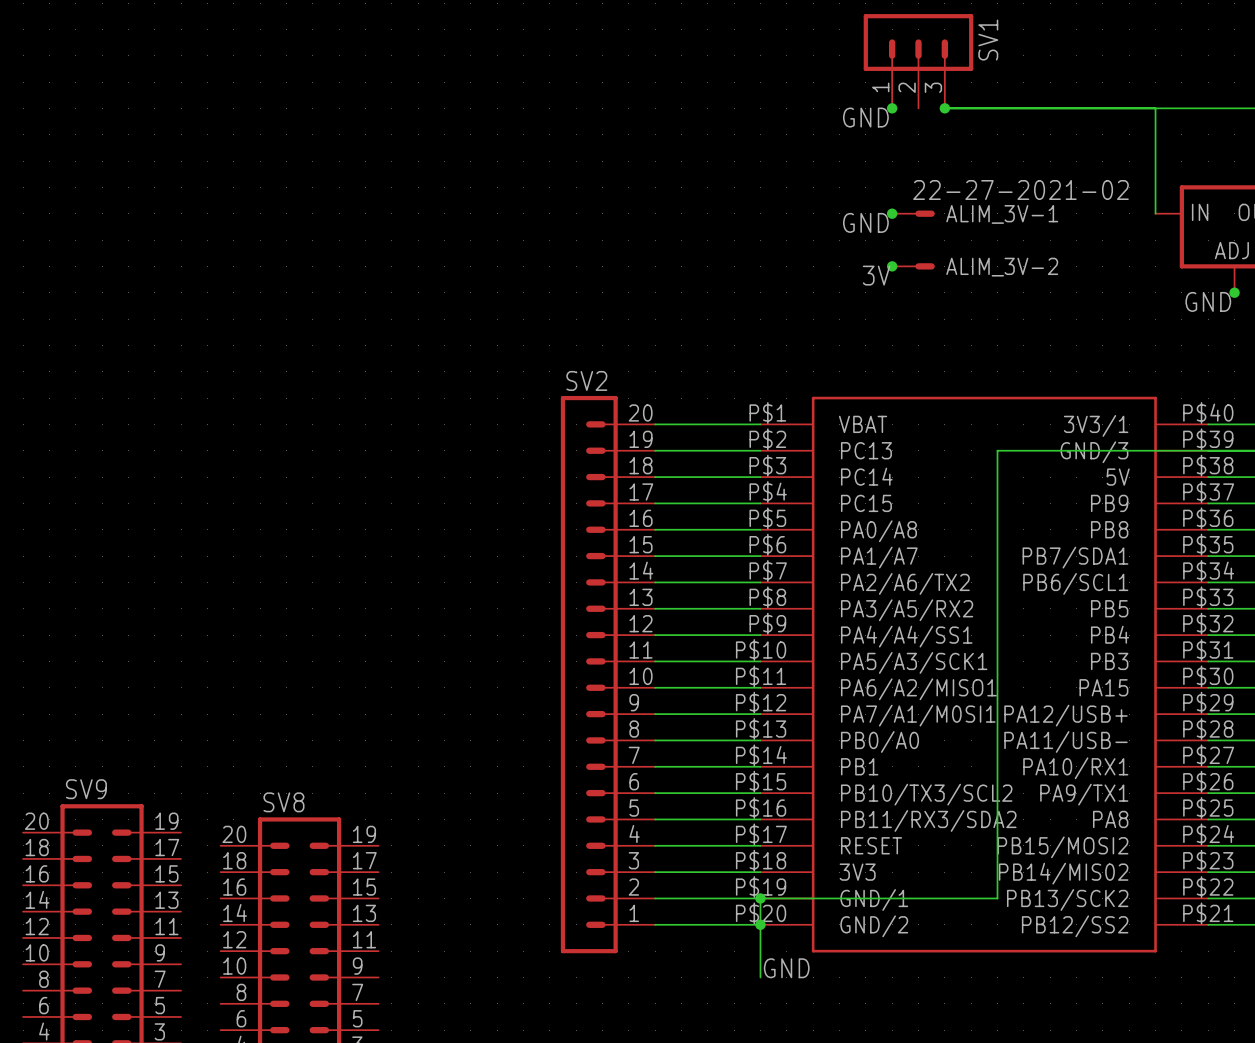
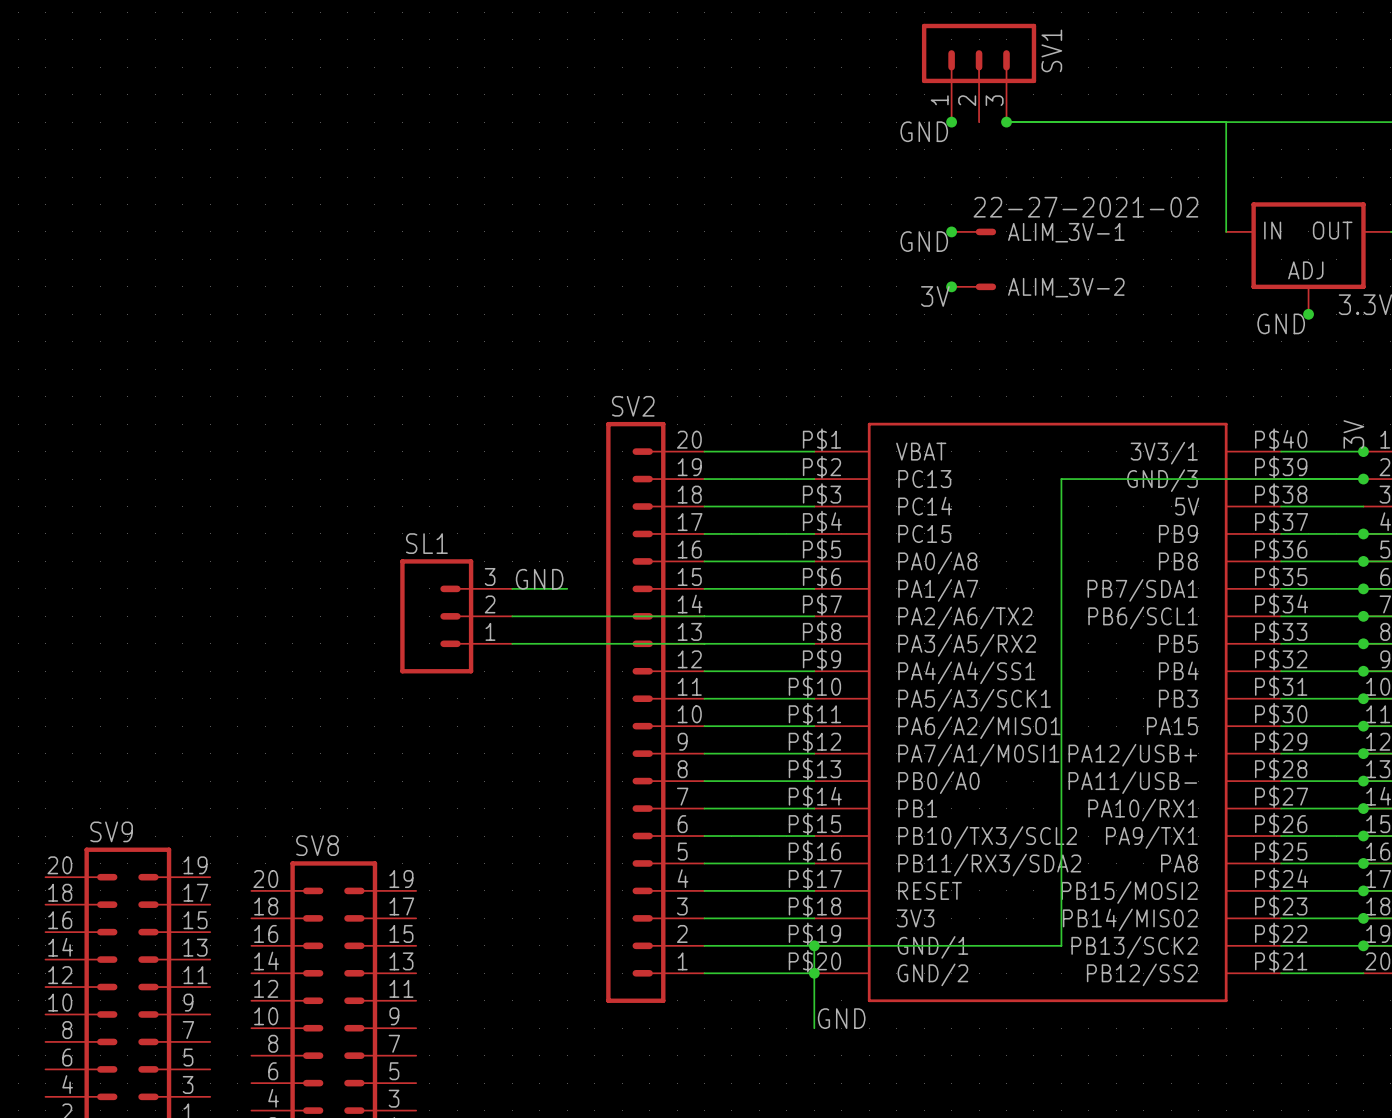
label: none -> GND (539, 579)
wire: none -> (512, 588) (567, 588)
SL1: none -> (456, 616)
wire: none -> (512, 616) (704, 616)
wire: none -> (512, 643) (704, 643)

